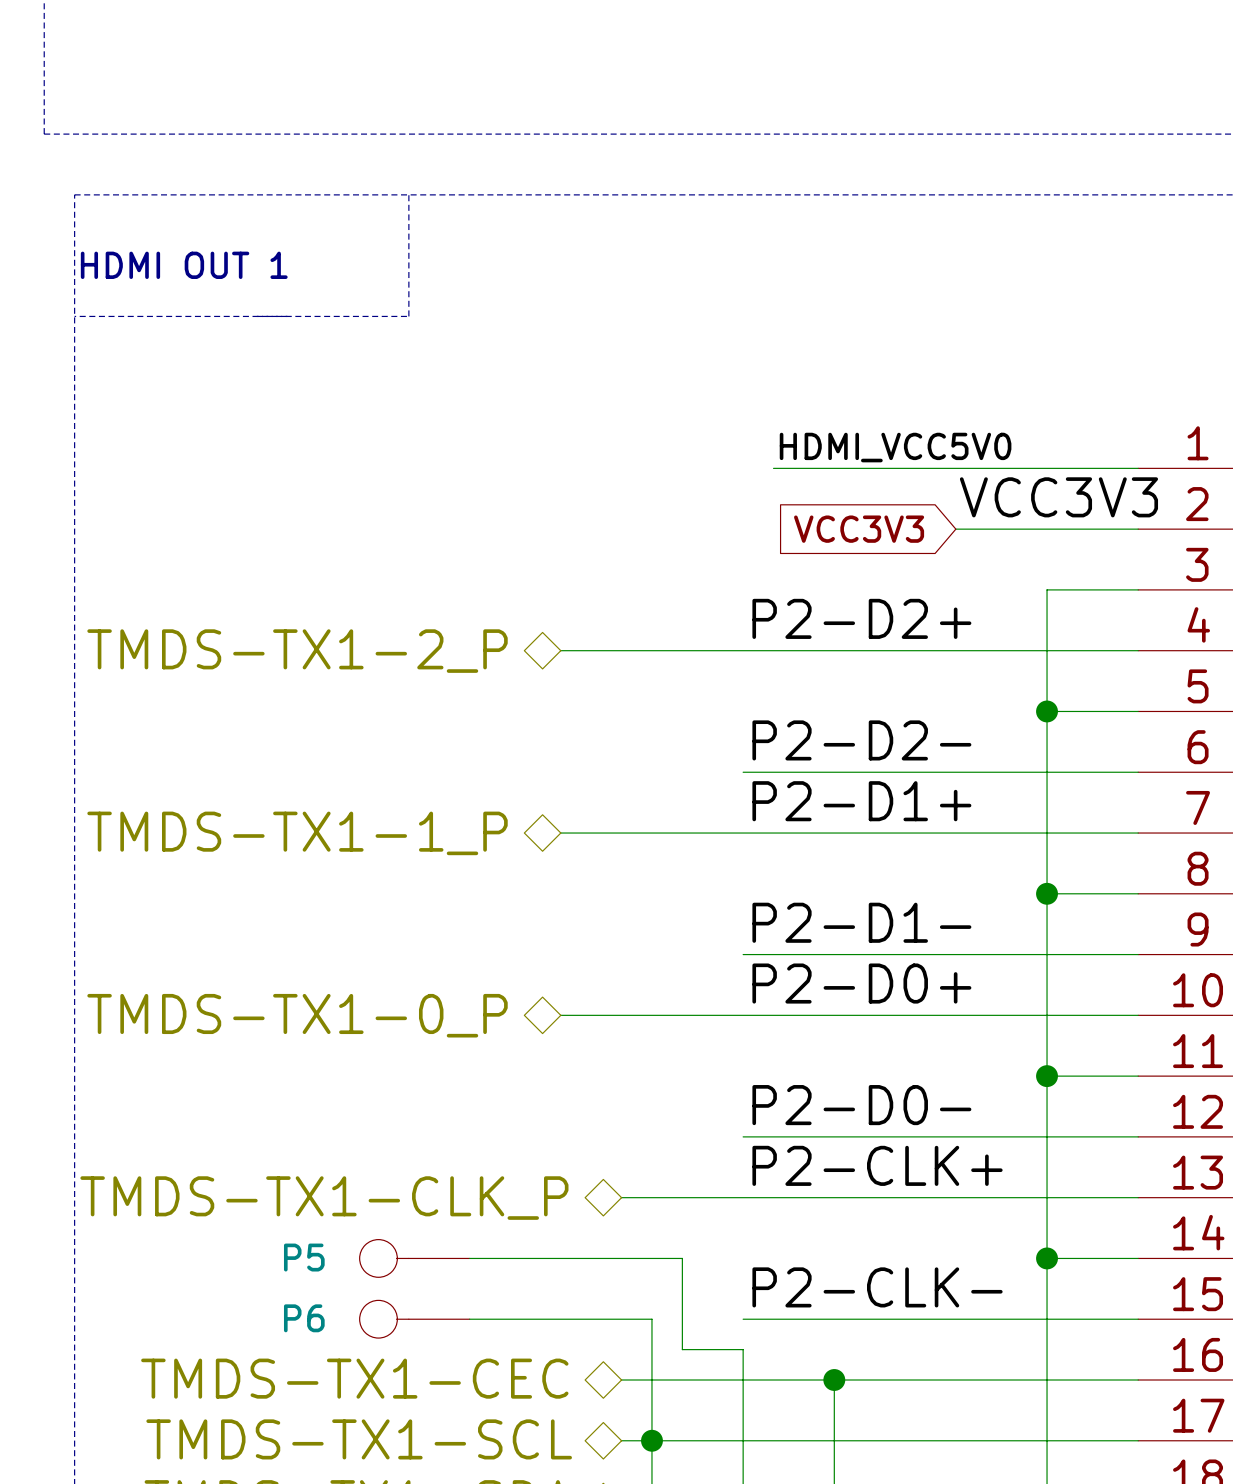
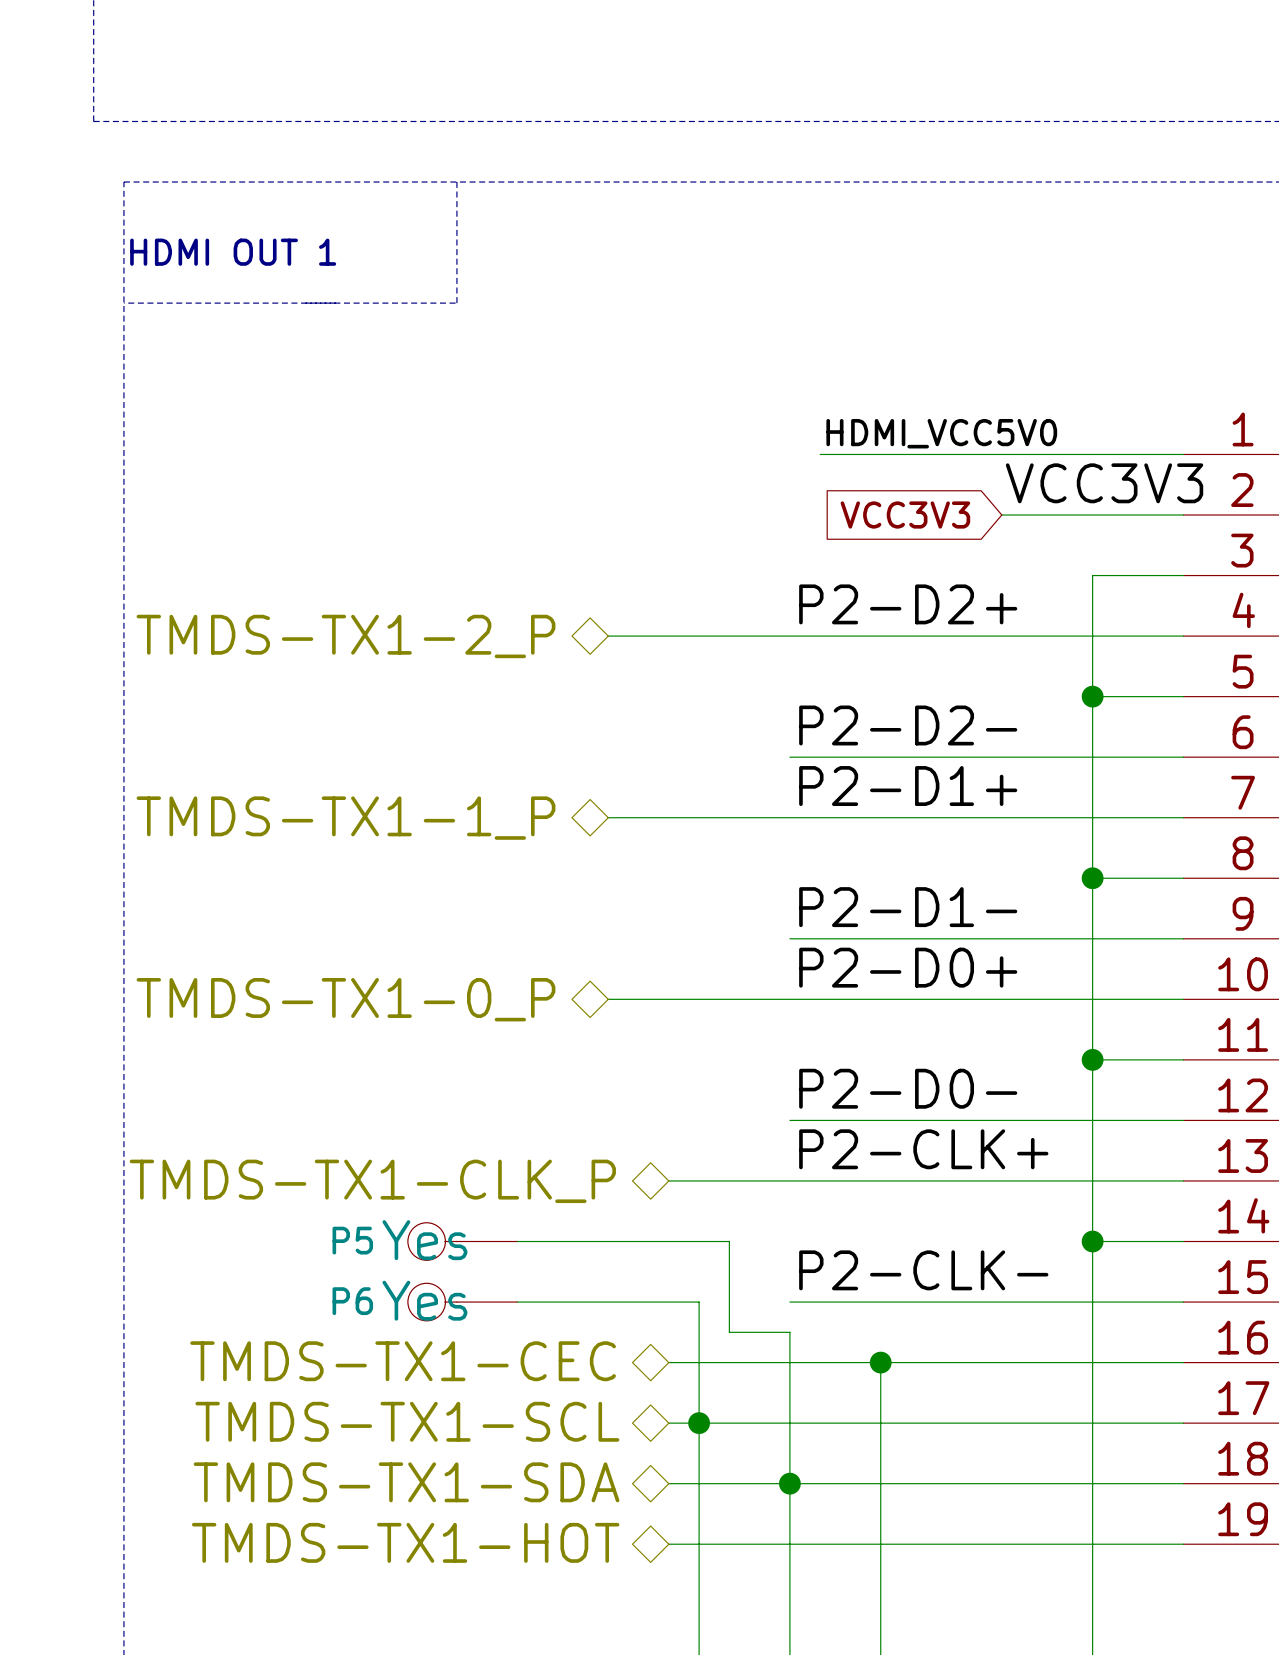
P5 text: none -> Yes (424, 1240)
P6 text: none -> Yes (424, 1300)

